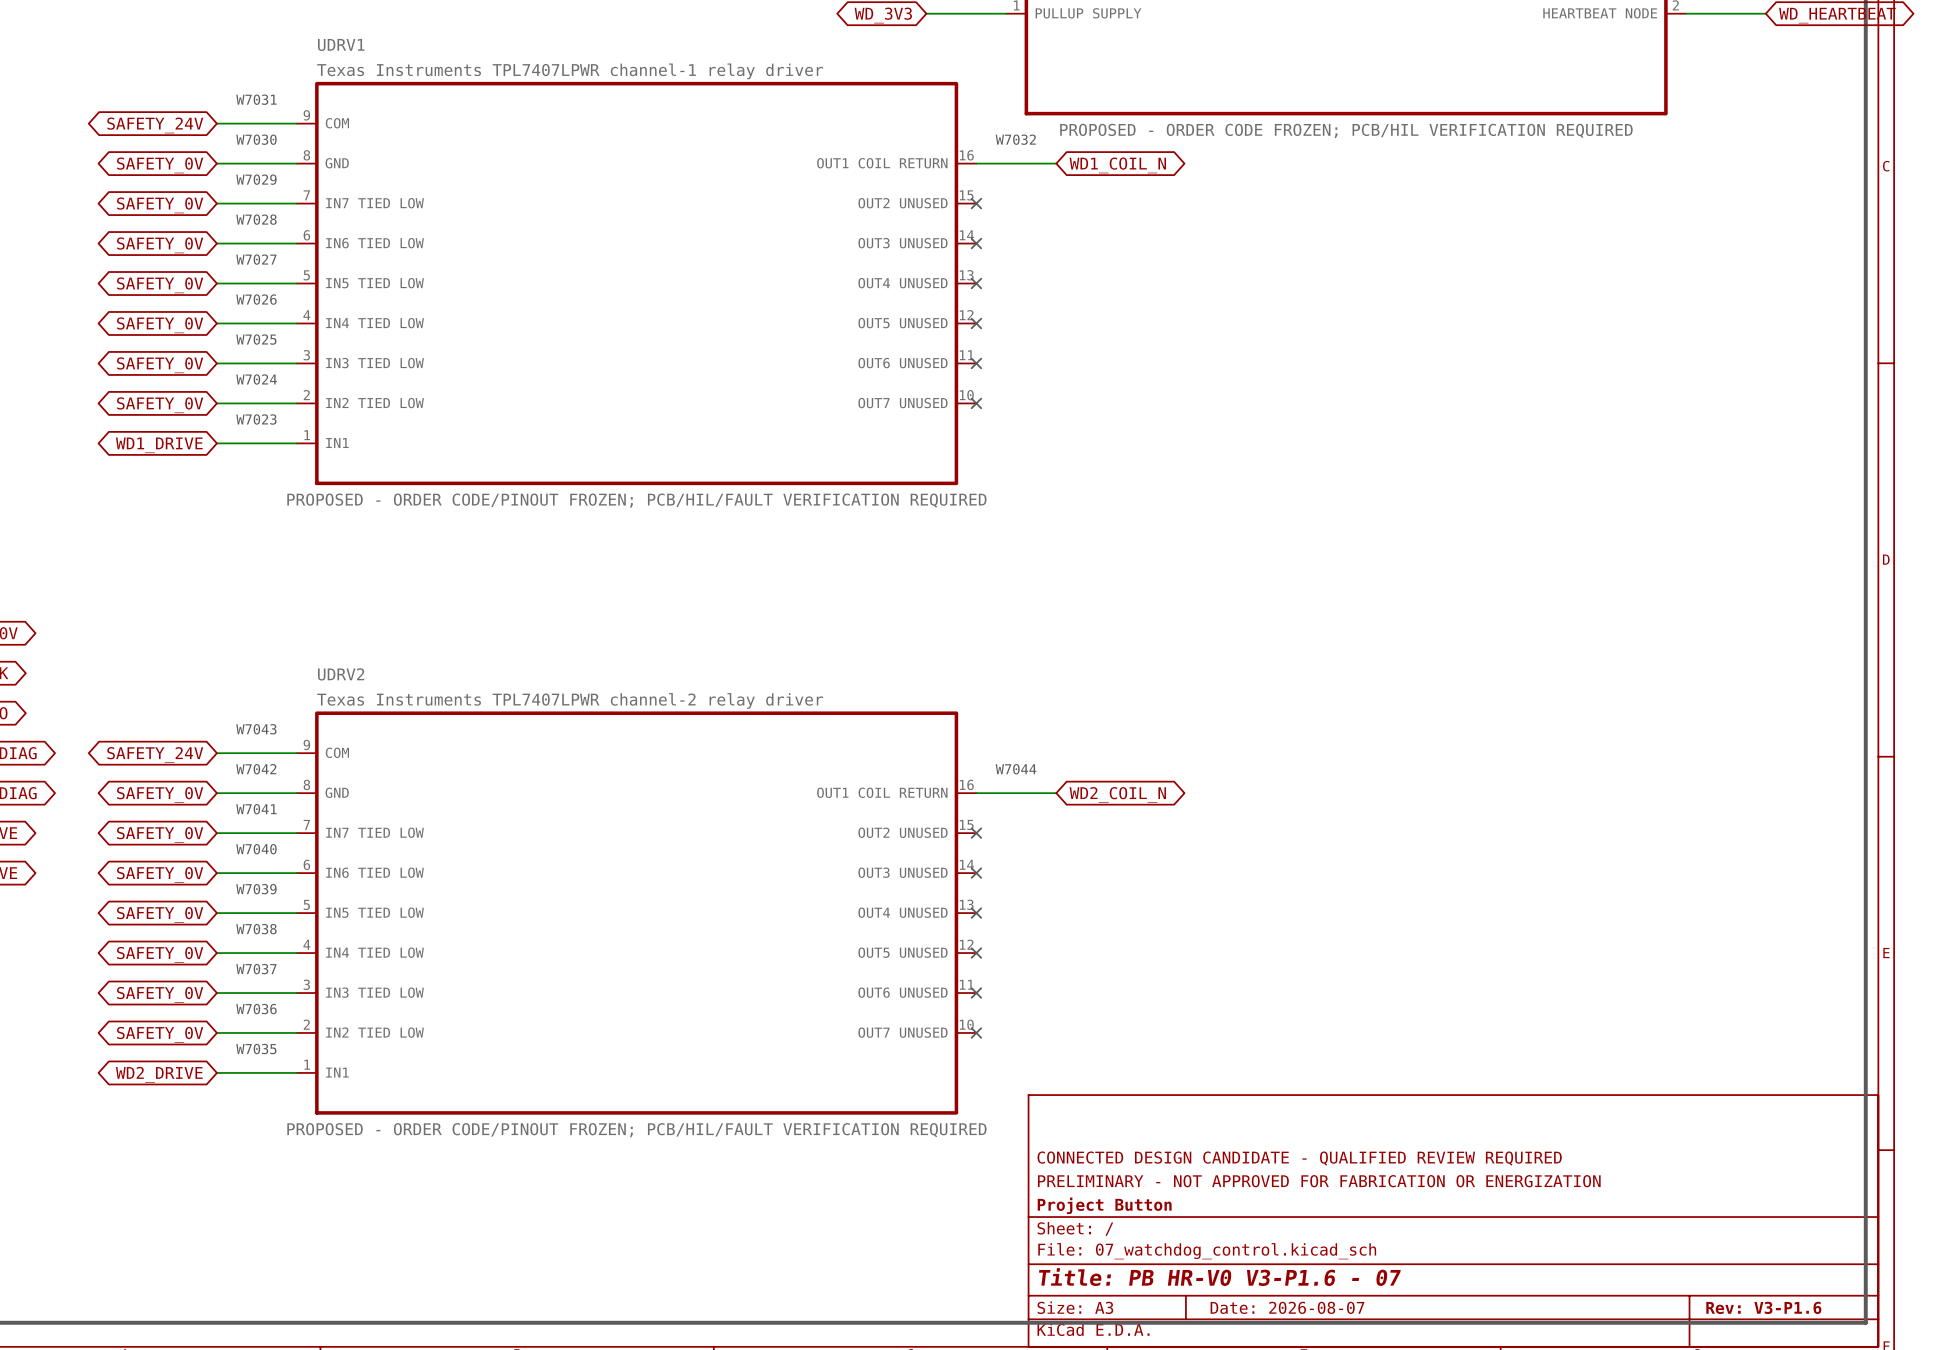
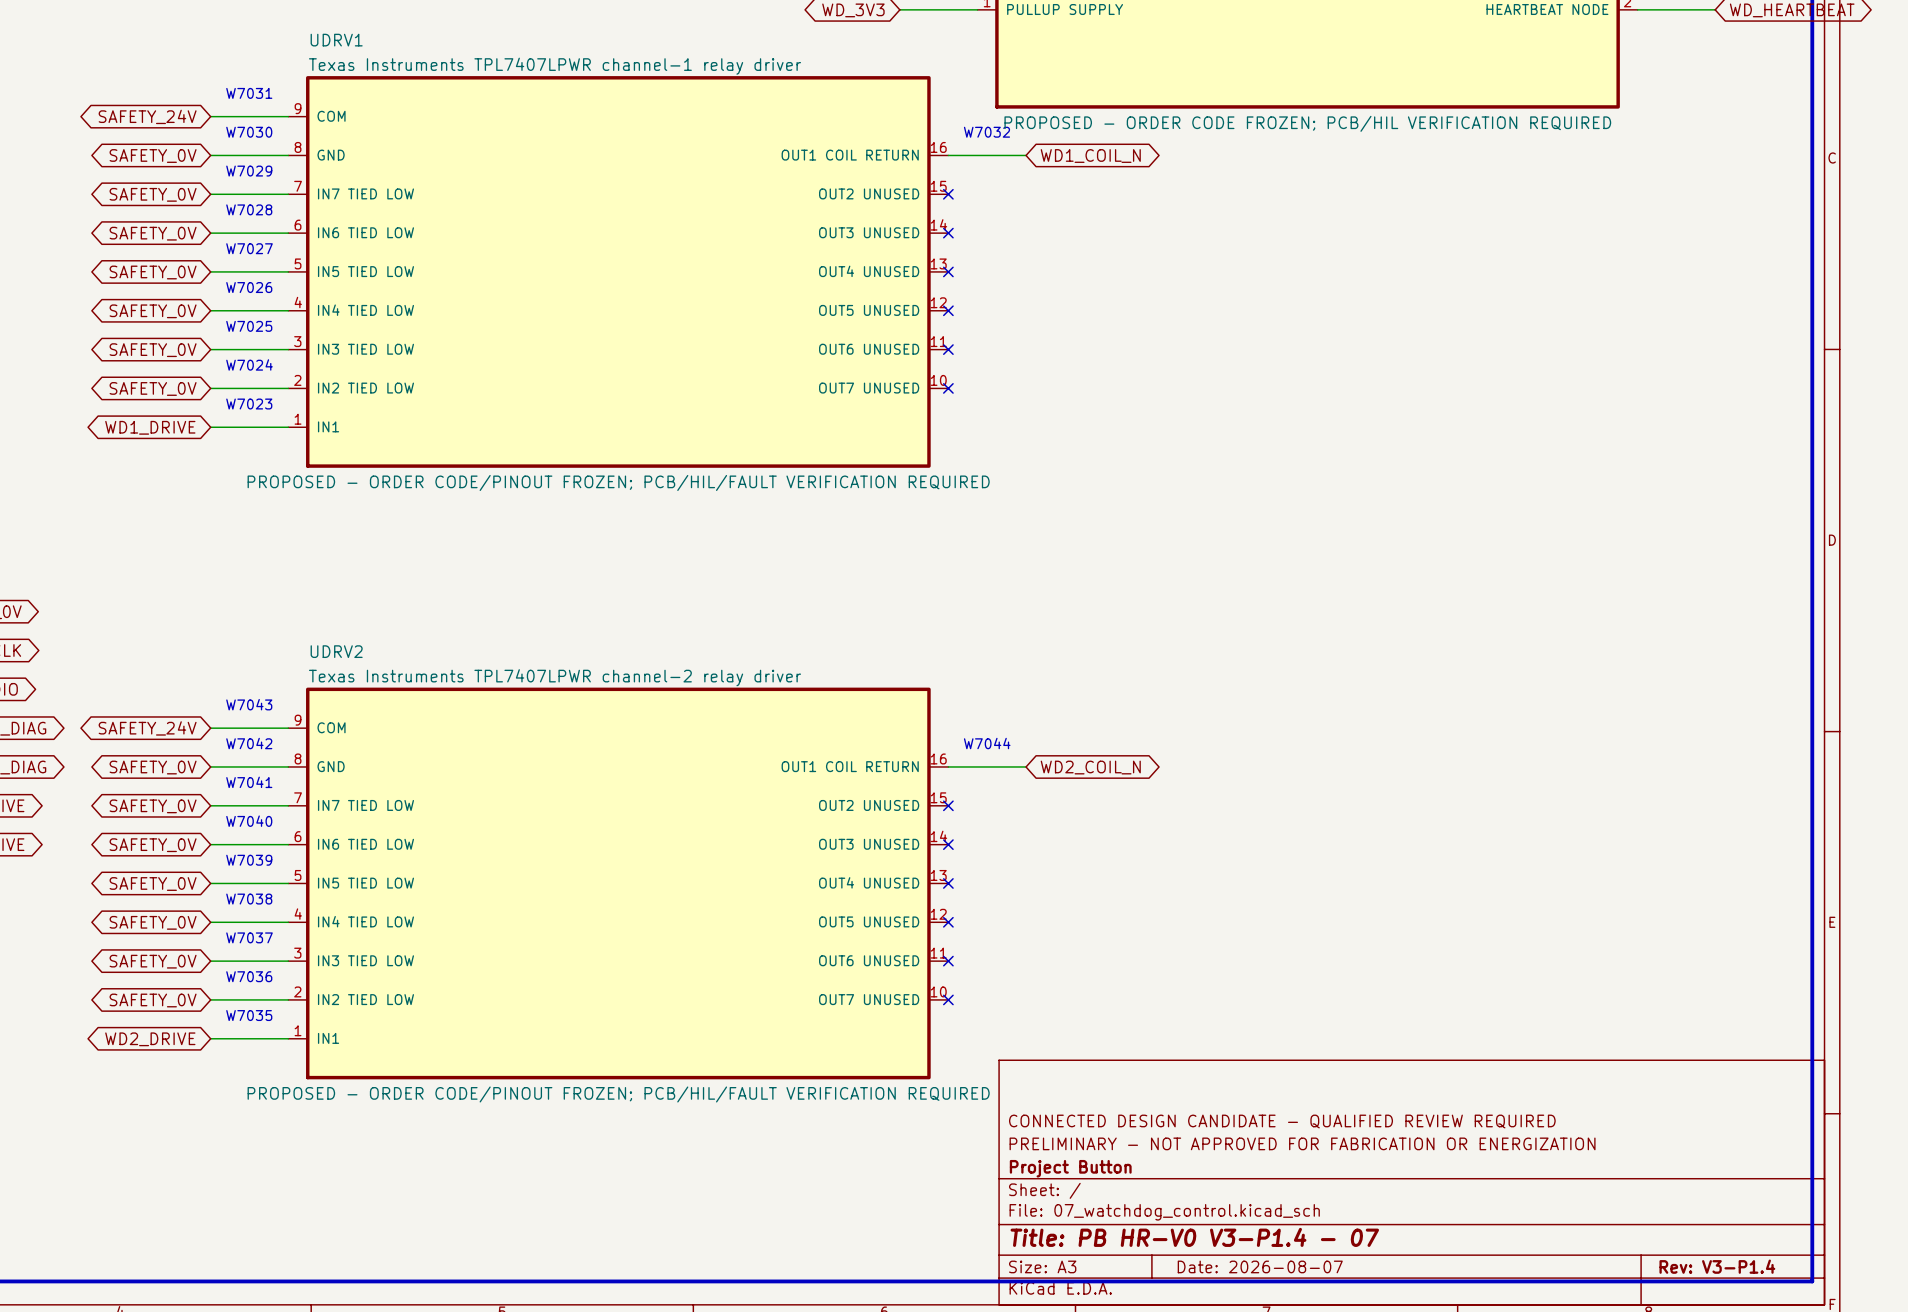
title block: Title: PB HR-V0 V3-P1.6 - 07 (1219, 1277) -> Title: PB HR-V0 V3-P1.4 - 07 (1194, 1237)
title block: Rev: V3-P1.6 (1763, 1307) -> Rev: V3-P1.4 (1717, 1266)

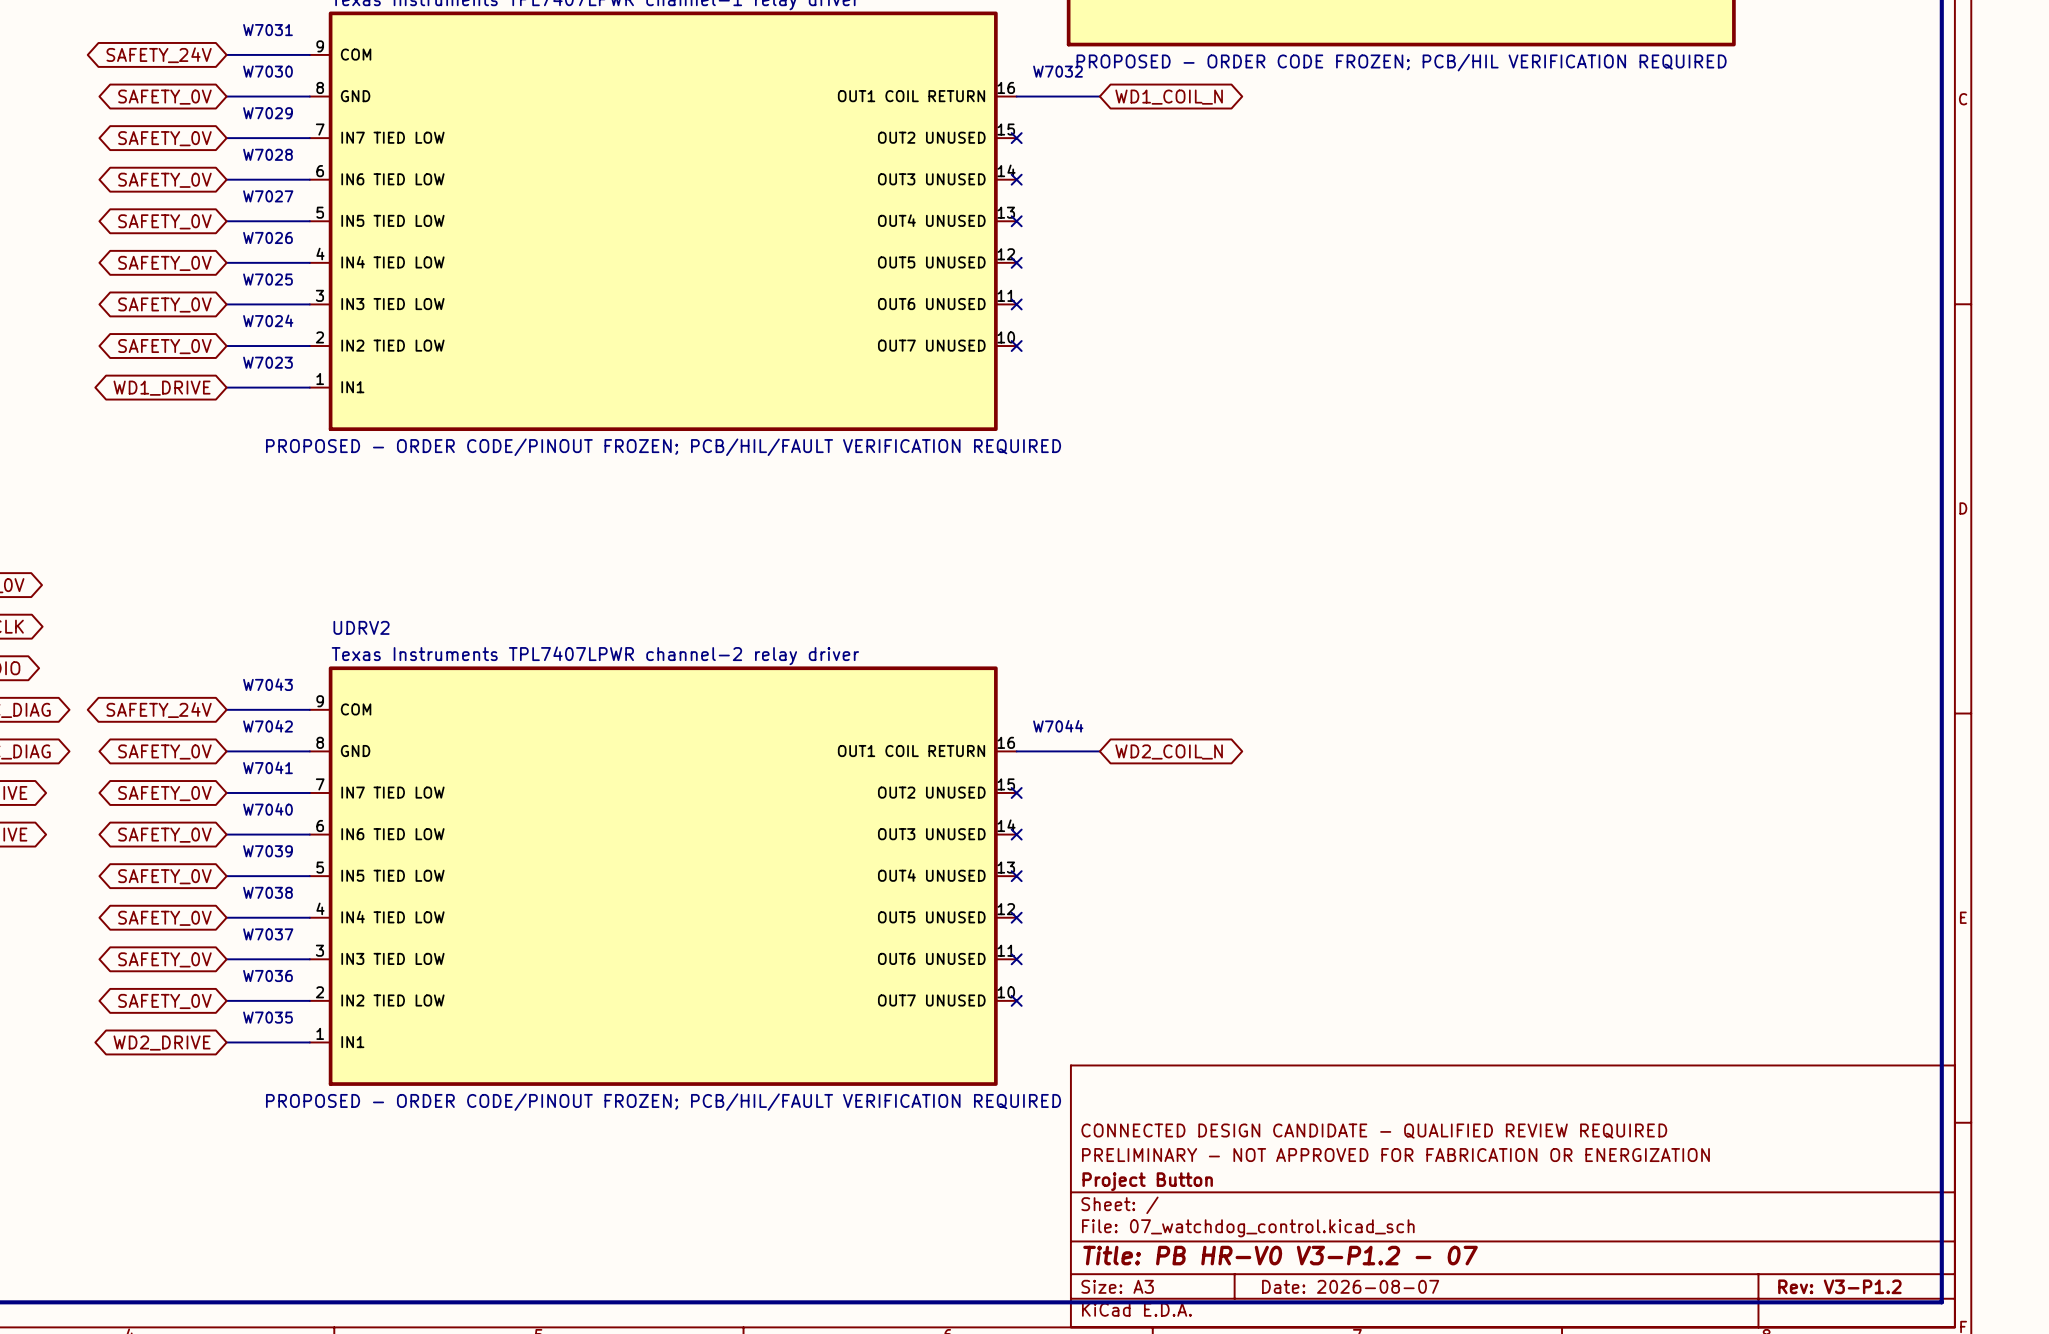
title block: Title: PB HR-V0 V3-P1.4 - 07 (1194, 1237) -> Title: PB HR-V0 V3-P1.2 - 07 (1280, 1255)
title block: Rev: V3-P1.4 (1717, 1266) -> Rev: V3-P1.2 (1839, 1286)

